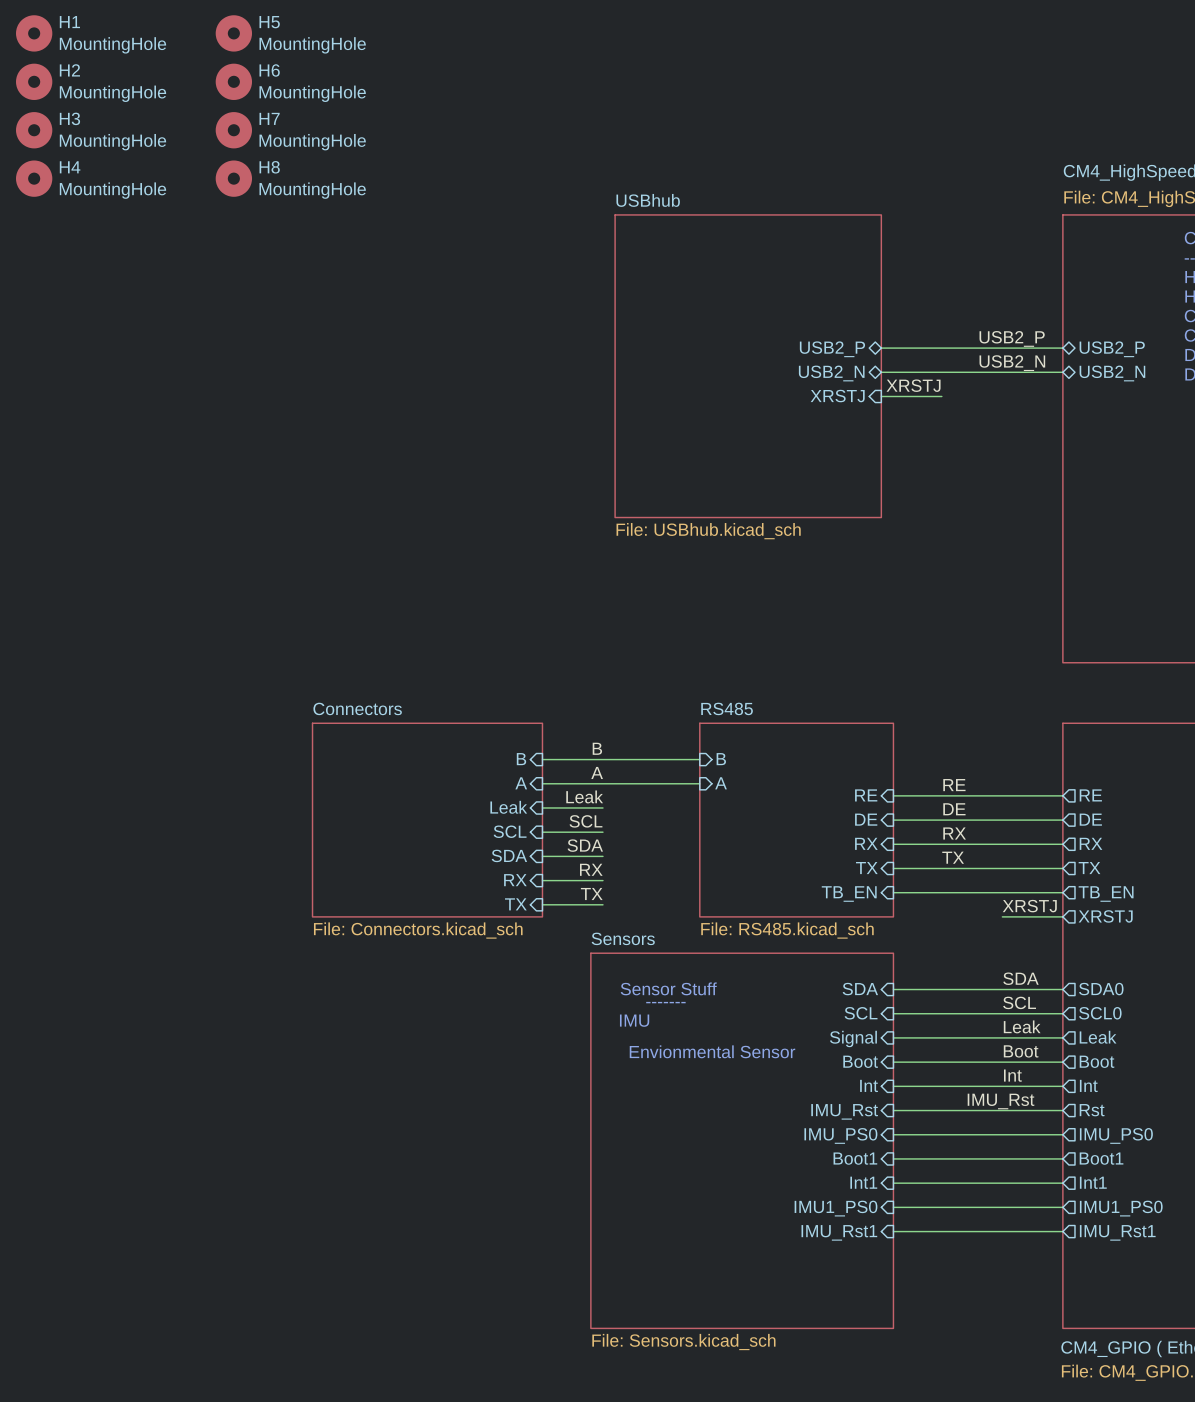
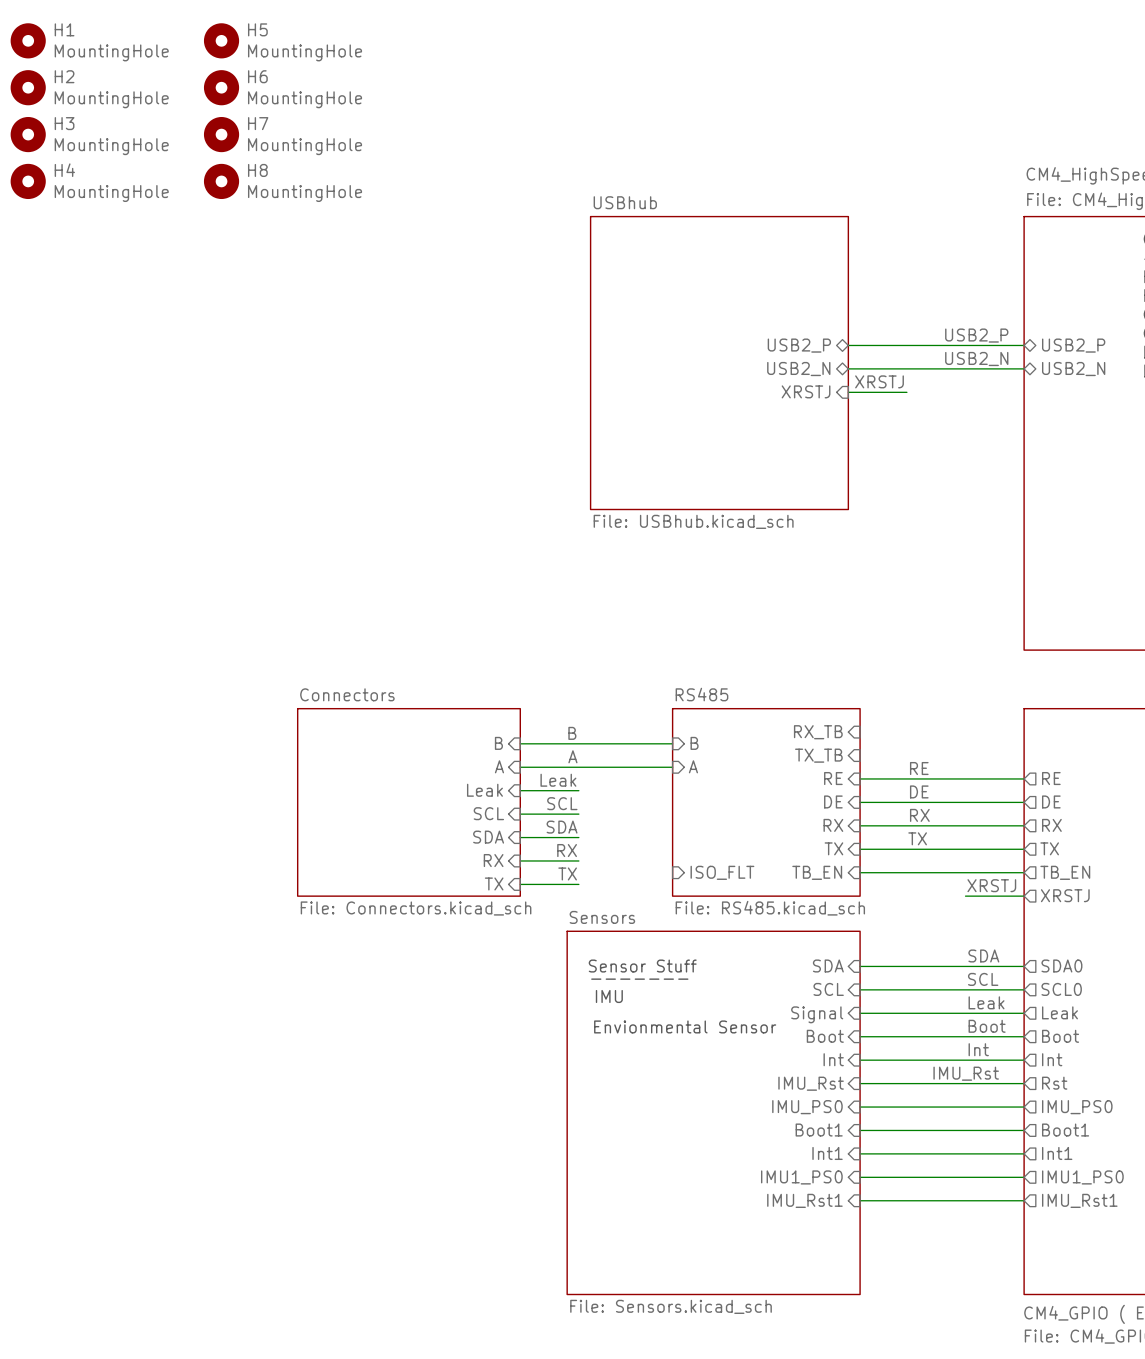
sheet pin: none -> RX_TB (818, 732)
sheet pin: none -> TX_TB (818, 755)
sheet pin: none -> ISO_FLT (722, 872)

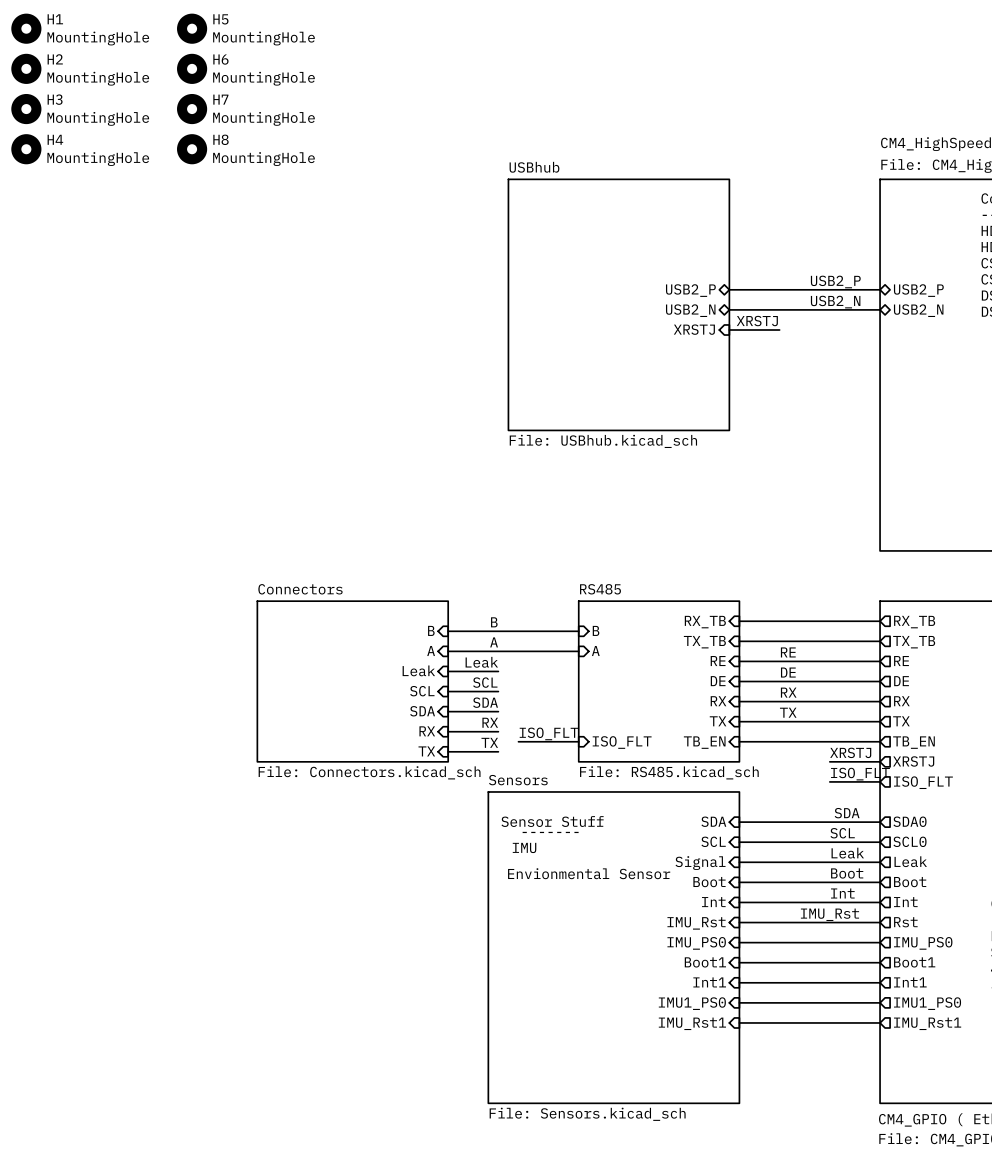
wire: none -> (739, 621) (880, 621)
sheet pin: none -> RX_TB (914, 622)
wire: none -> (739, 641) (880, 641)
sheet pin: none -> TX_TB (914, 642)
label: none -> ISO_FLT (549, 733)
wire: none -> (518, 741) (578, 741)
label: none -> ISO_FLT (860, 774)
wire: none -> (829, 781) (880, 781)
sheet pin: none -> ISO_FLT (923, 782)

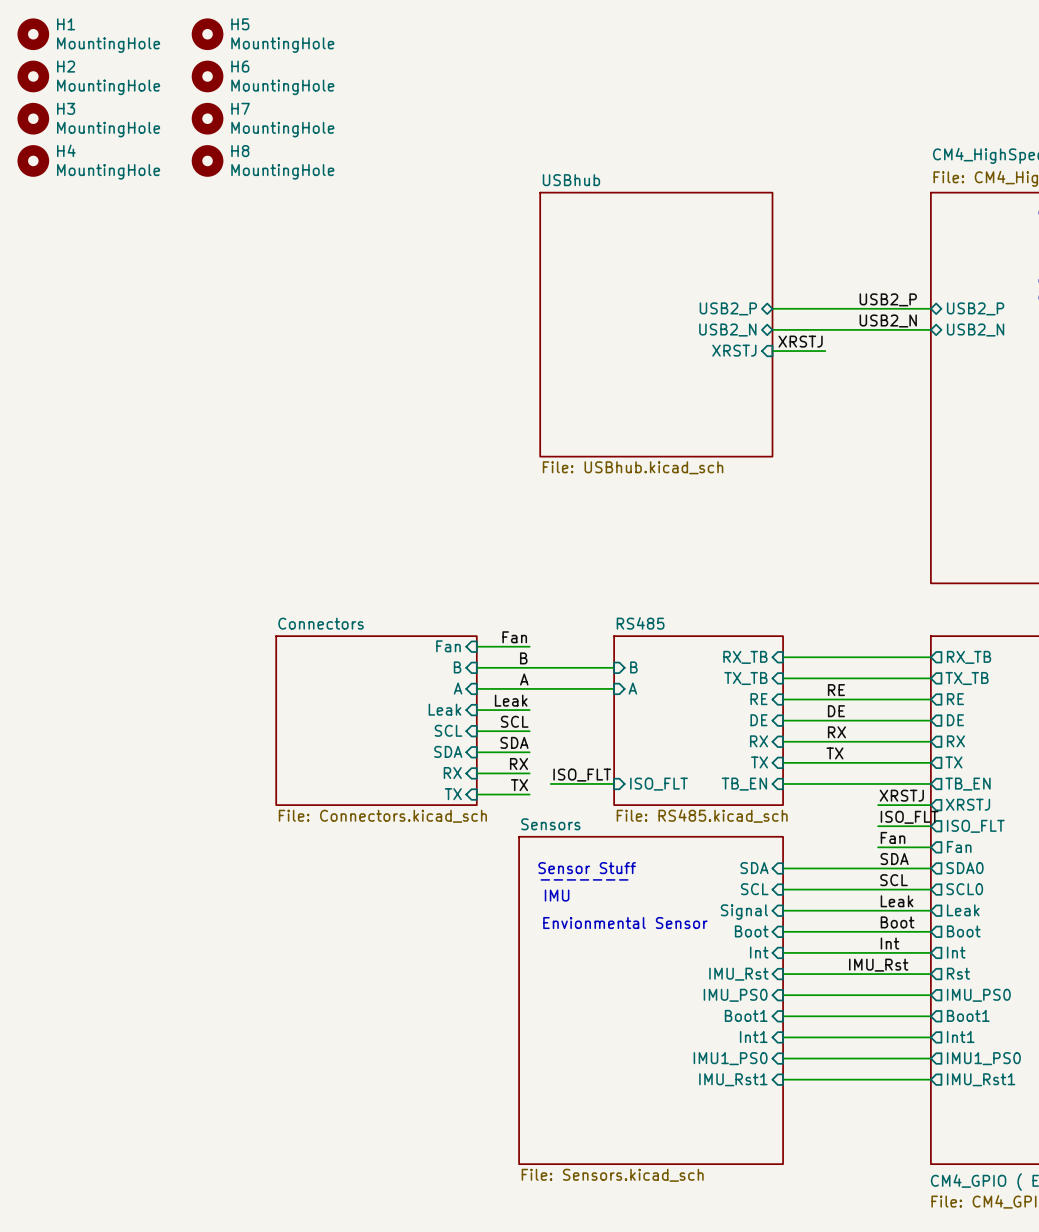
label: none -> Fan (514, 637)
sheet pin: none -> Fan (448, 646)
wire: none -> (476, 646) (529, 646)
label: none -> Fan (893, 837)
sheet pin: none -> Fan (959, 846)
wire: none -> (878, 847) (930, 847)

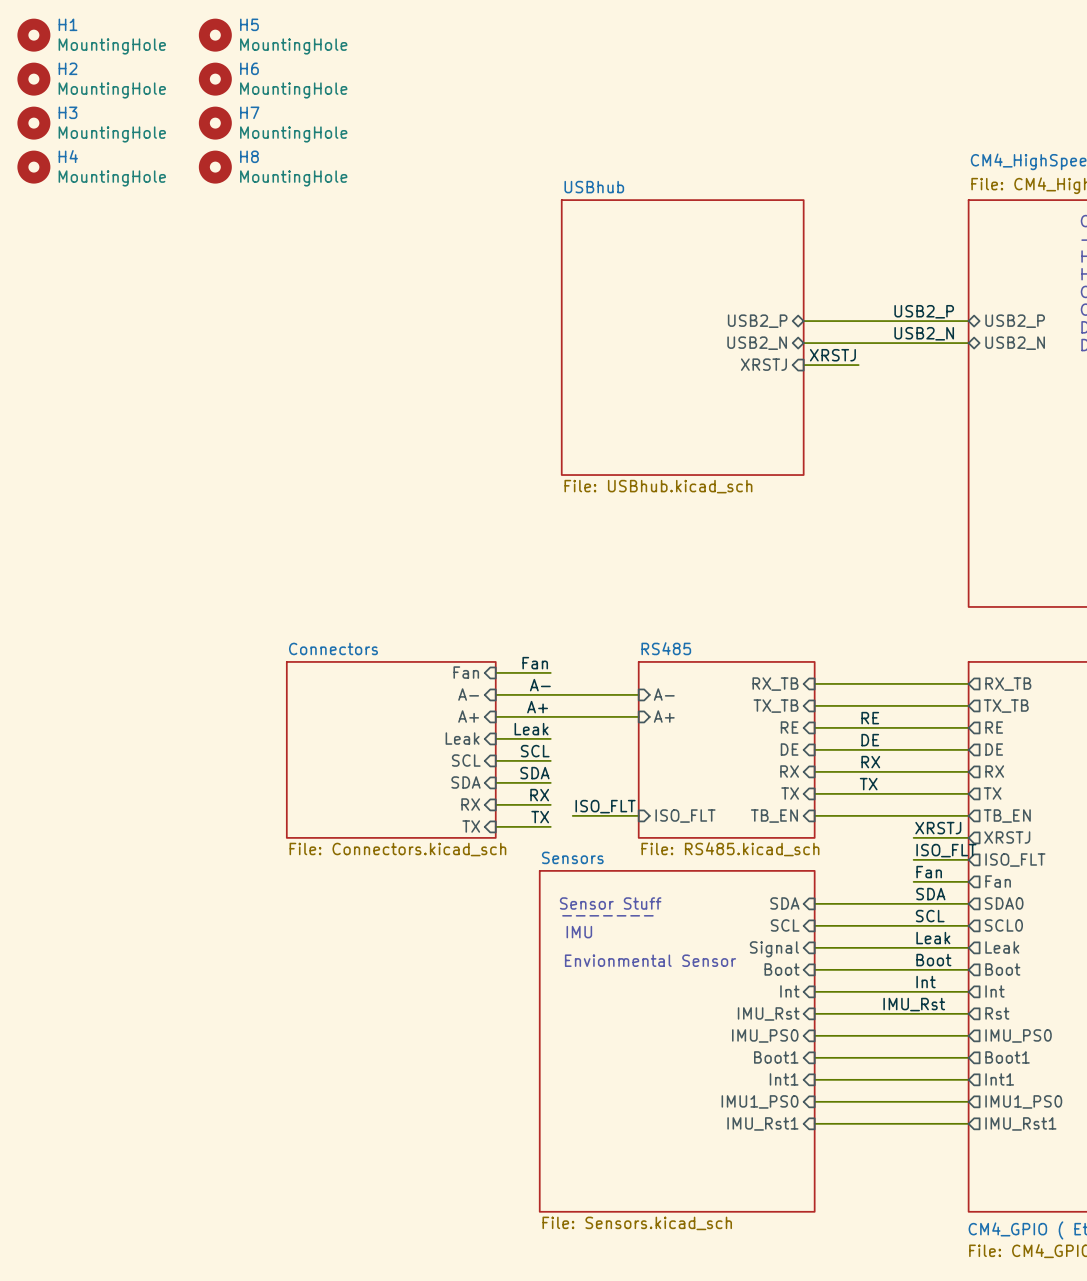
label: none -> A- (540, 685)
label: B (523, 658) -> none
sheet pin: B (457, 667) -> A- (468, 694)
sheet pin: B (633, 667) -> A- (664, 694)
label: A (524, 679) -> A+ (537, 707)
sheet pin: A (458, 688) -> A+ (468, 716)
sheet pin: A (632, 688) -> A+ (664, 716)

